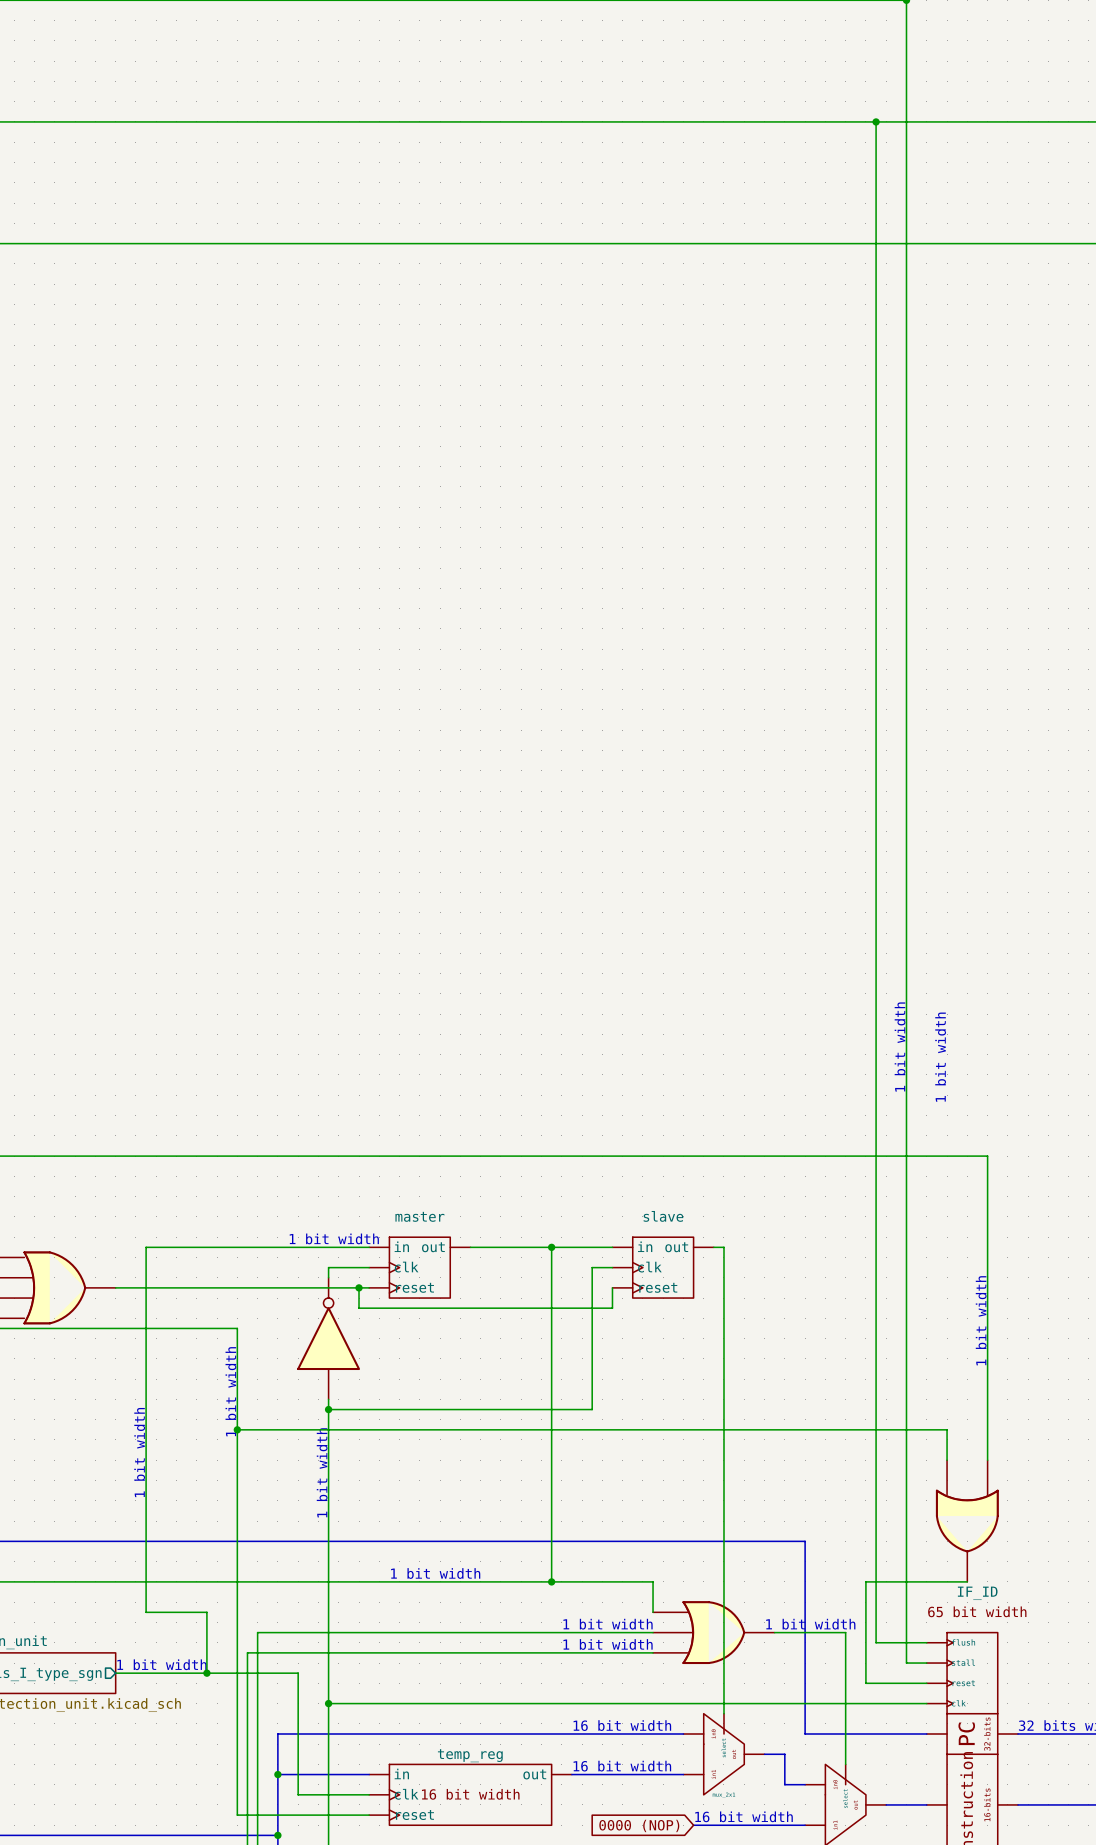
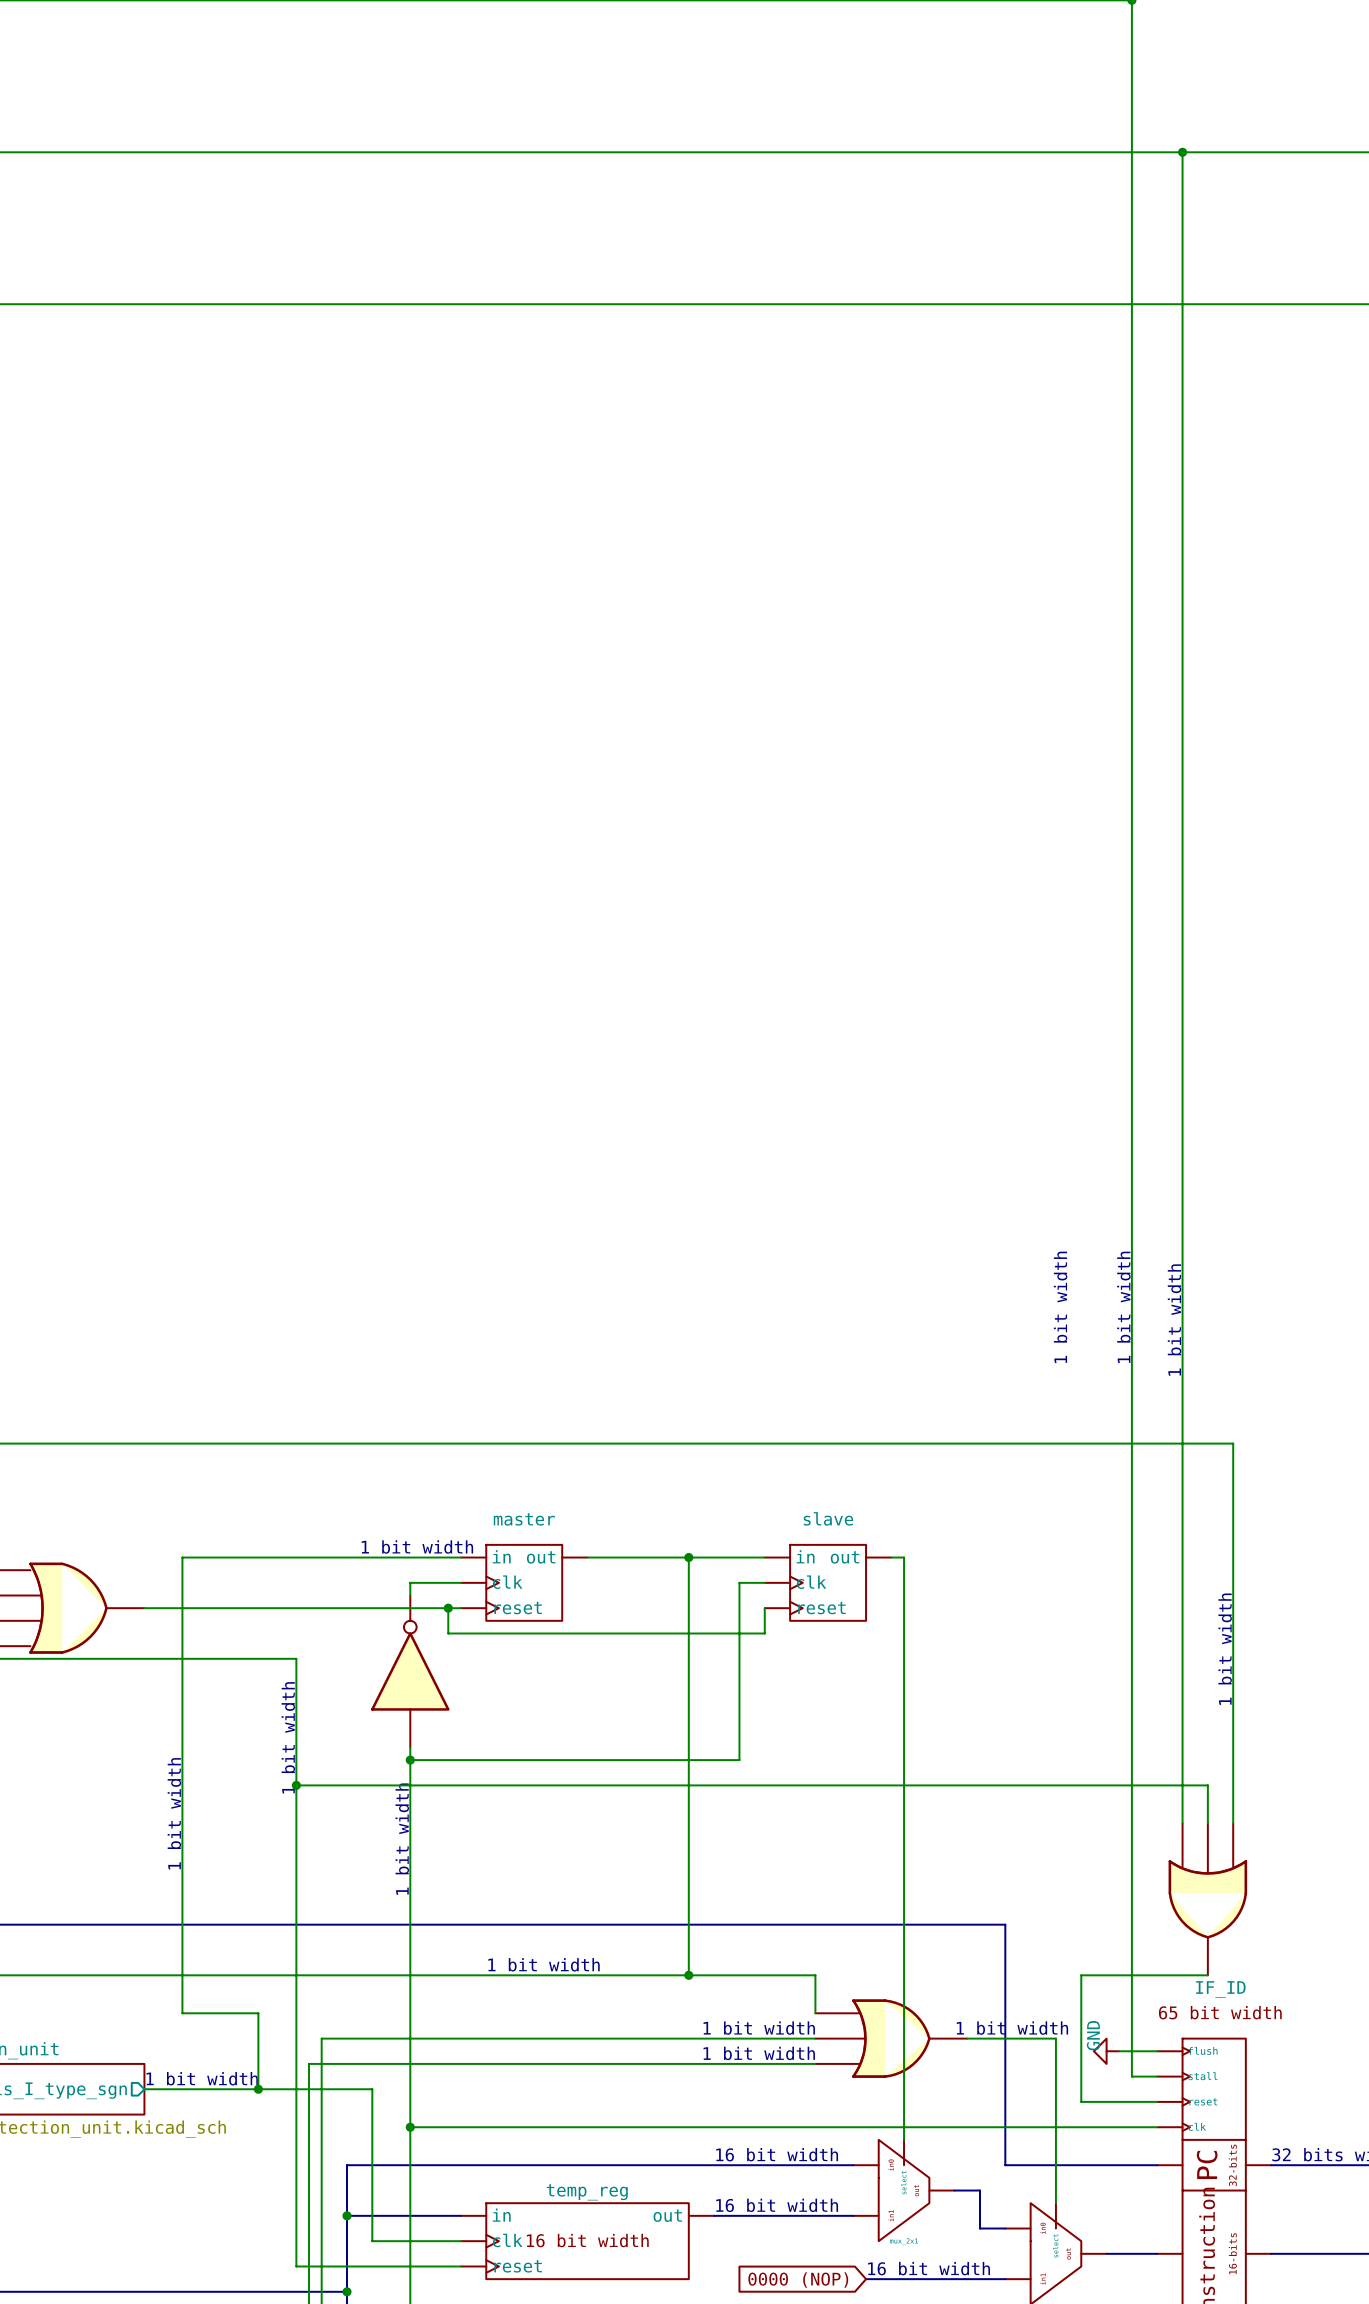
wire: (876, 121) (876, 1642) (896, 1642) -> none
junction: (876, 121) -> none
wire: none -> (1182, 152) (1182, 1785) (1207, 1785) (1207, 1823)
junction: none -> (1182, 152)
text: none -> 1 bit width (1060, 1307)
part symbol: [935, 1460, 999, 1582] -> [1168, 1823, 1248, 1976]
power symbol: none -> GND (1106, 2051)

